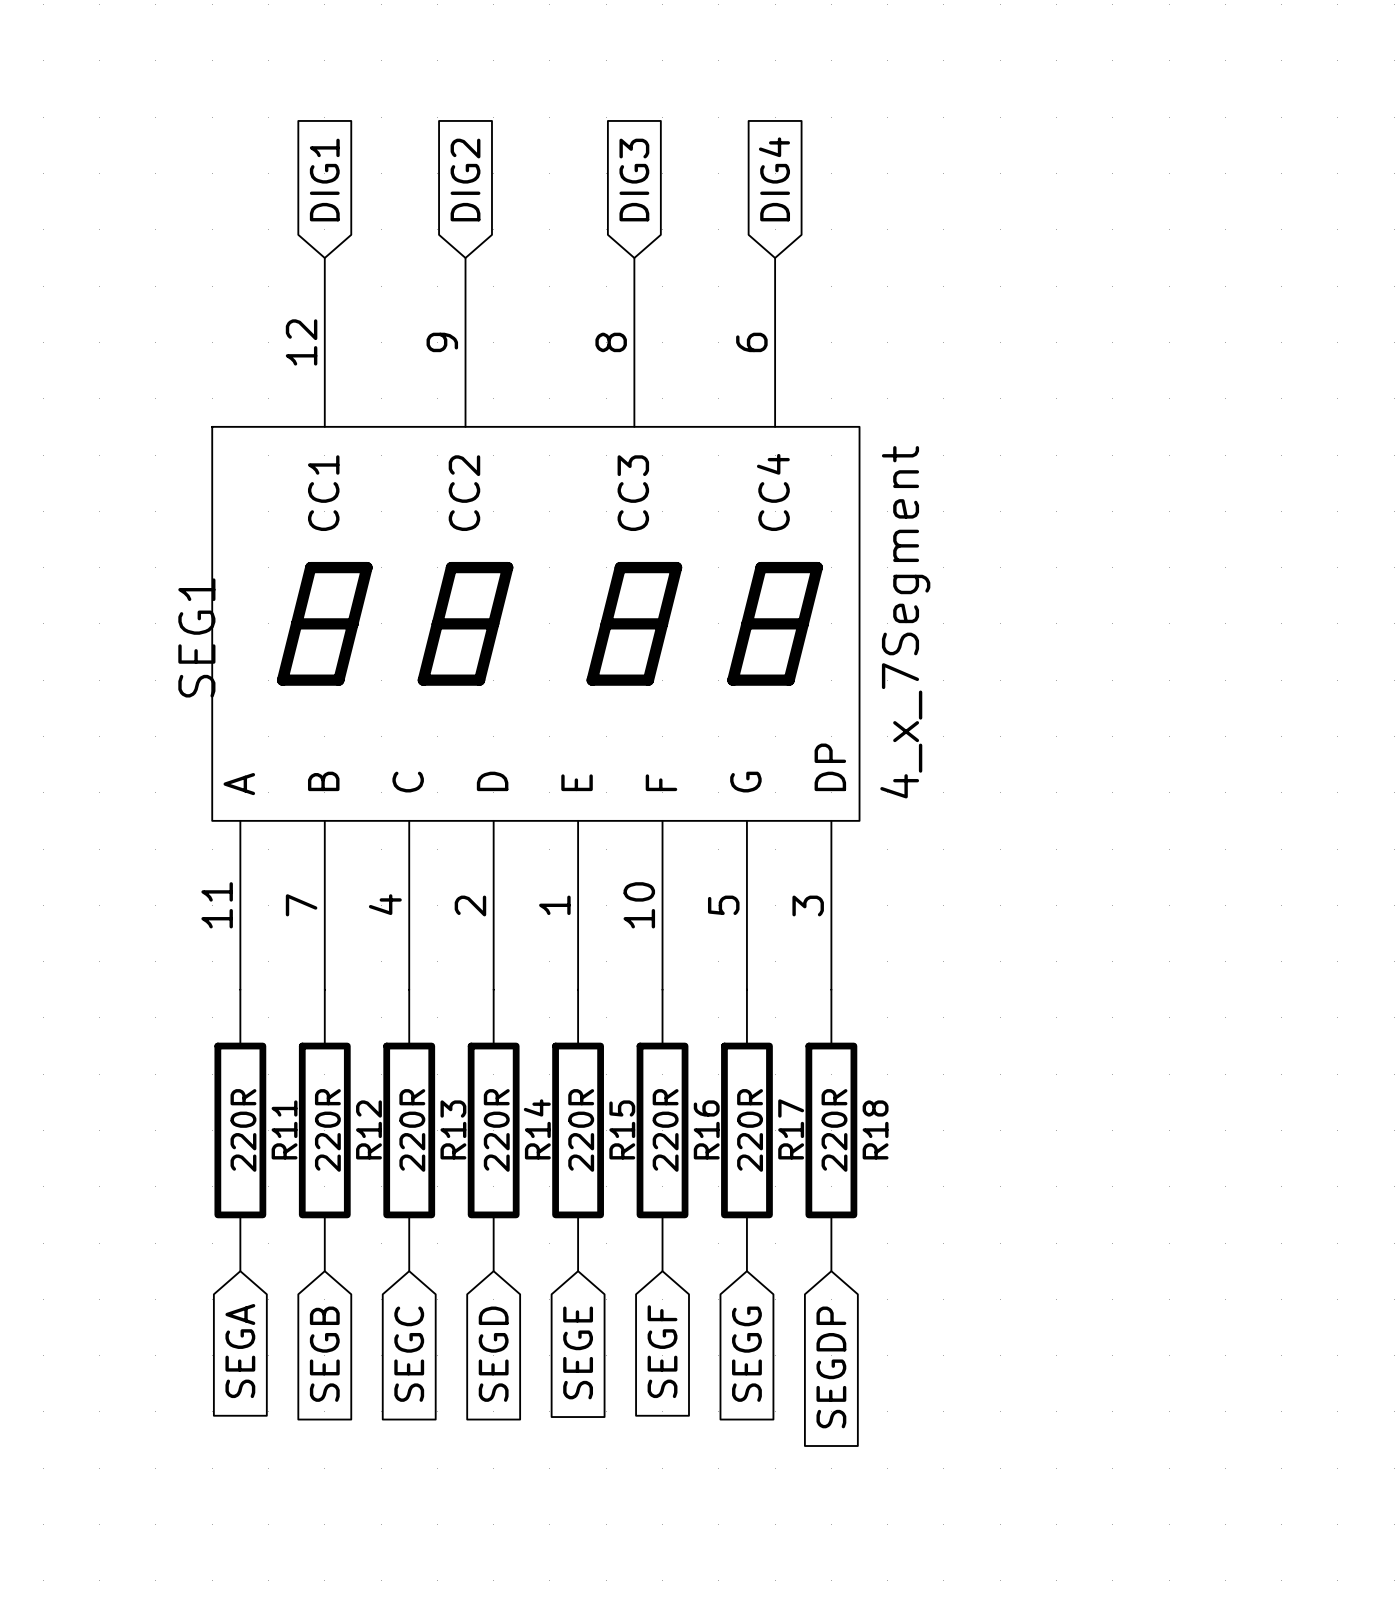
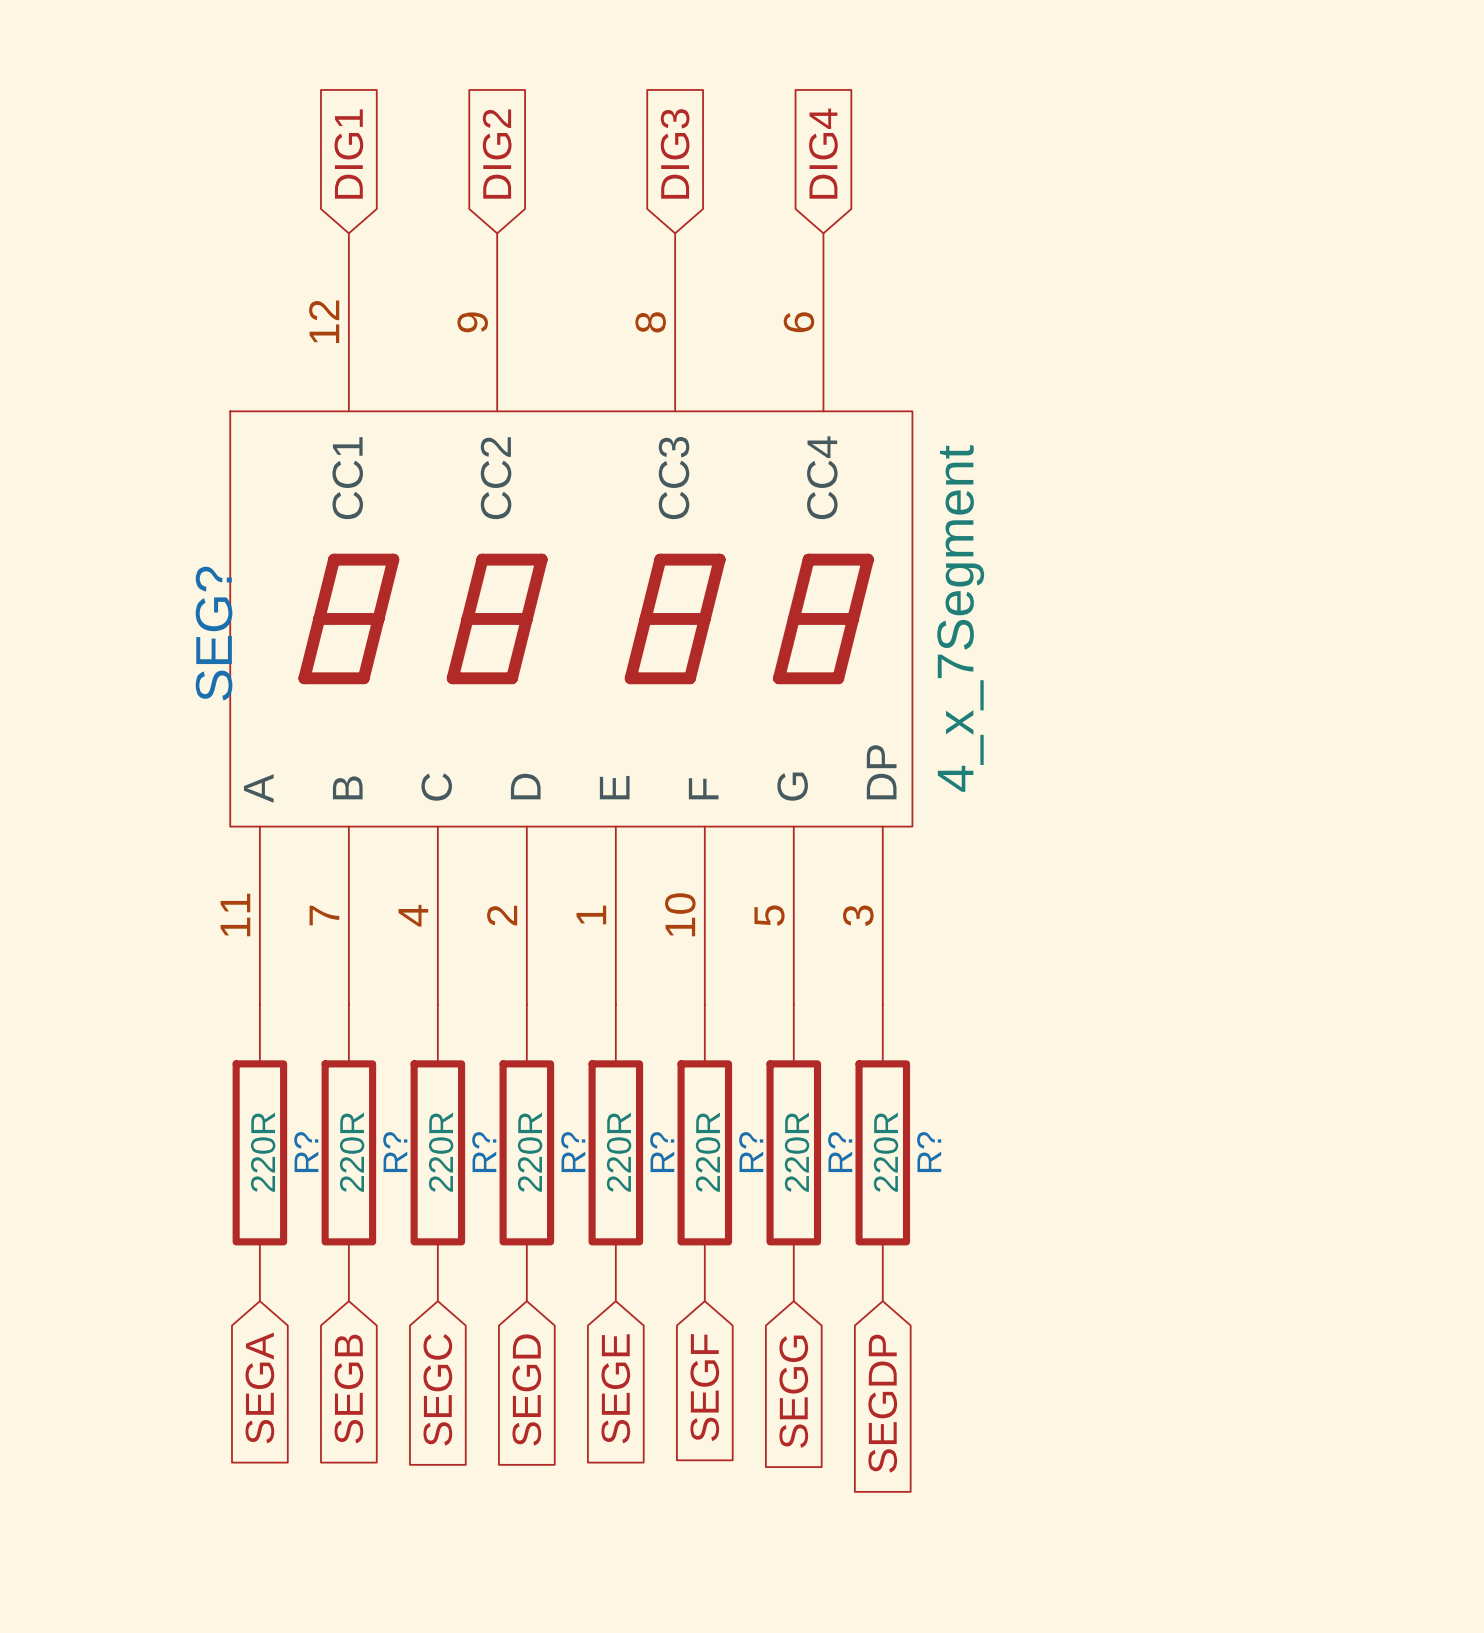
SEG1 name: SEG1 (196, 637) -> SEG? (214, 633)
R11 name: R11 (284, 1129) -> R? (306, 1152)
R12 name: R12 (368, 1129) -> R? (395, 1152)
R13 name: R13 (453, 1129) -> R? (484, 1152)
R14 name: R14 (537, 1129) -> R? (573, 1152)
R15 name: R15 (622, 1129) -> R? (662, 1152)
R16 name: R16 (706, 1129) -> R? (751, 1152)
R17 name: R17 (791, 1129) -> R? (840, 1152)
R18 name: R18 (875, 1129) -> R? (929, 1152)

